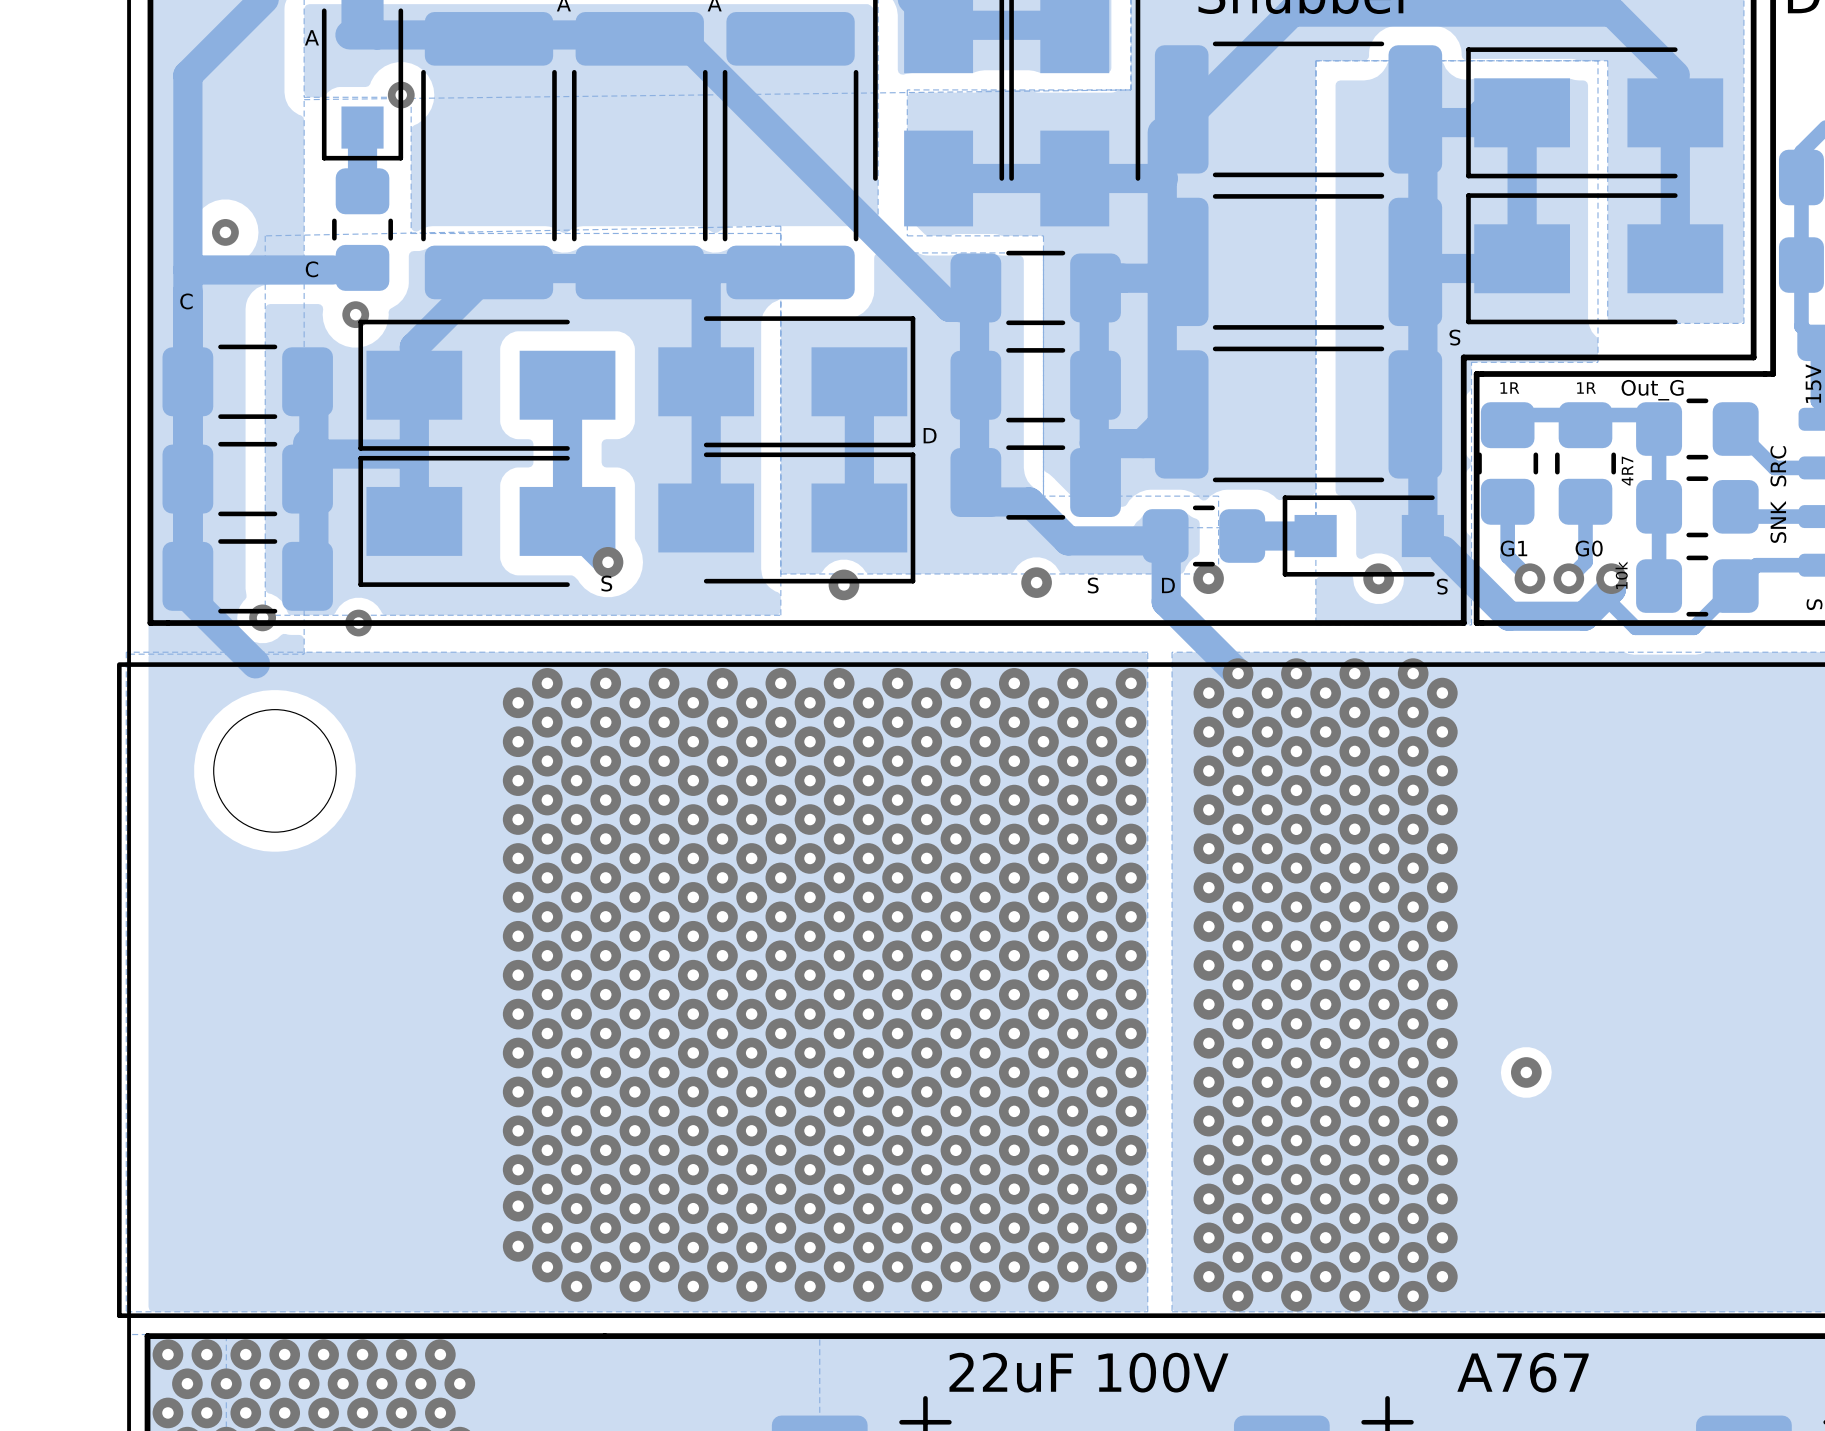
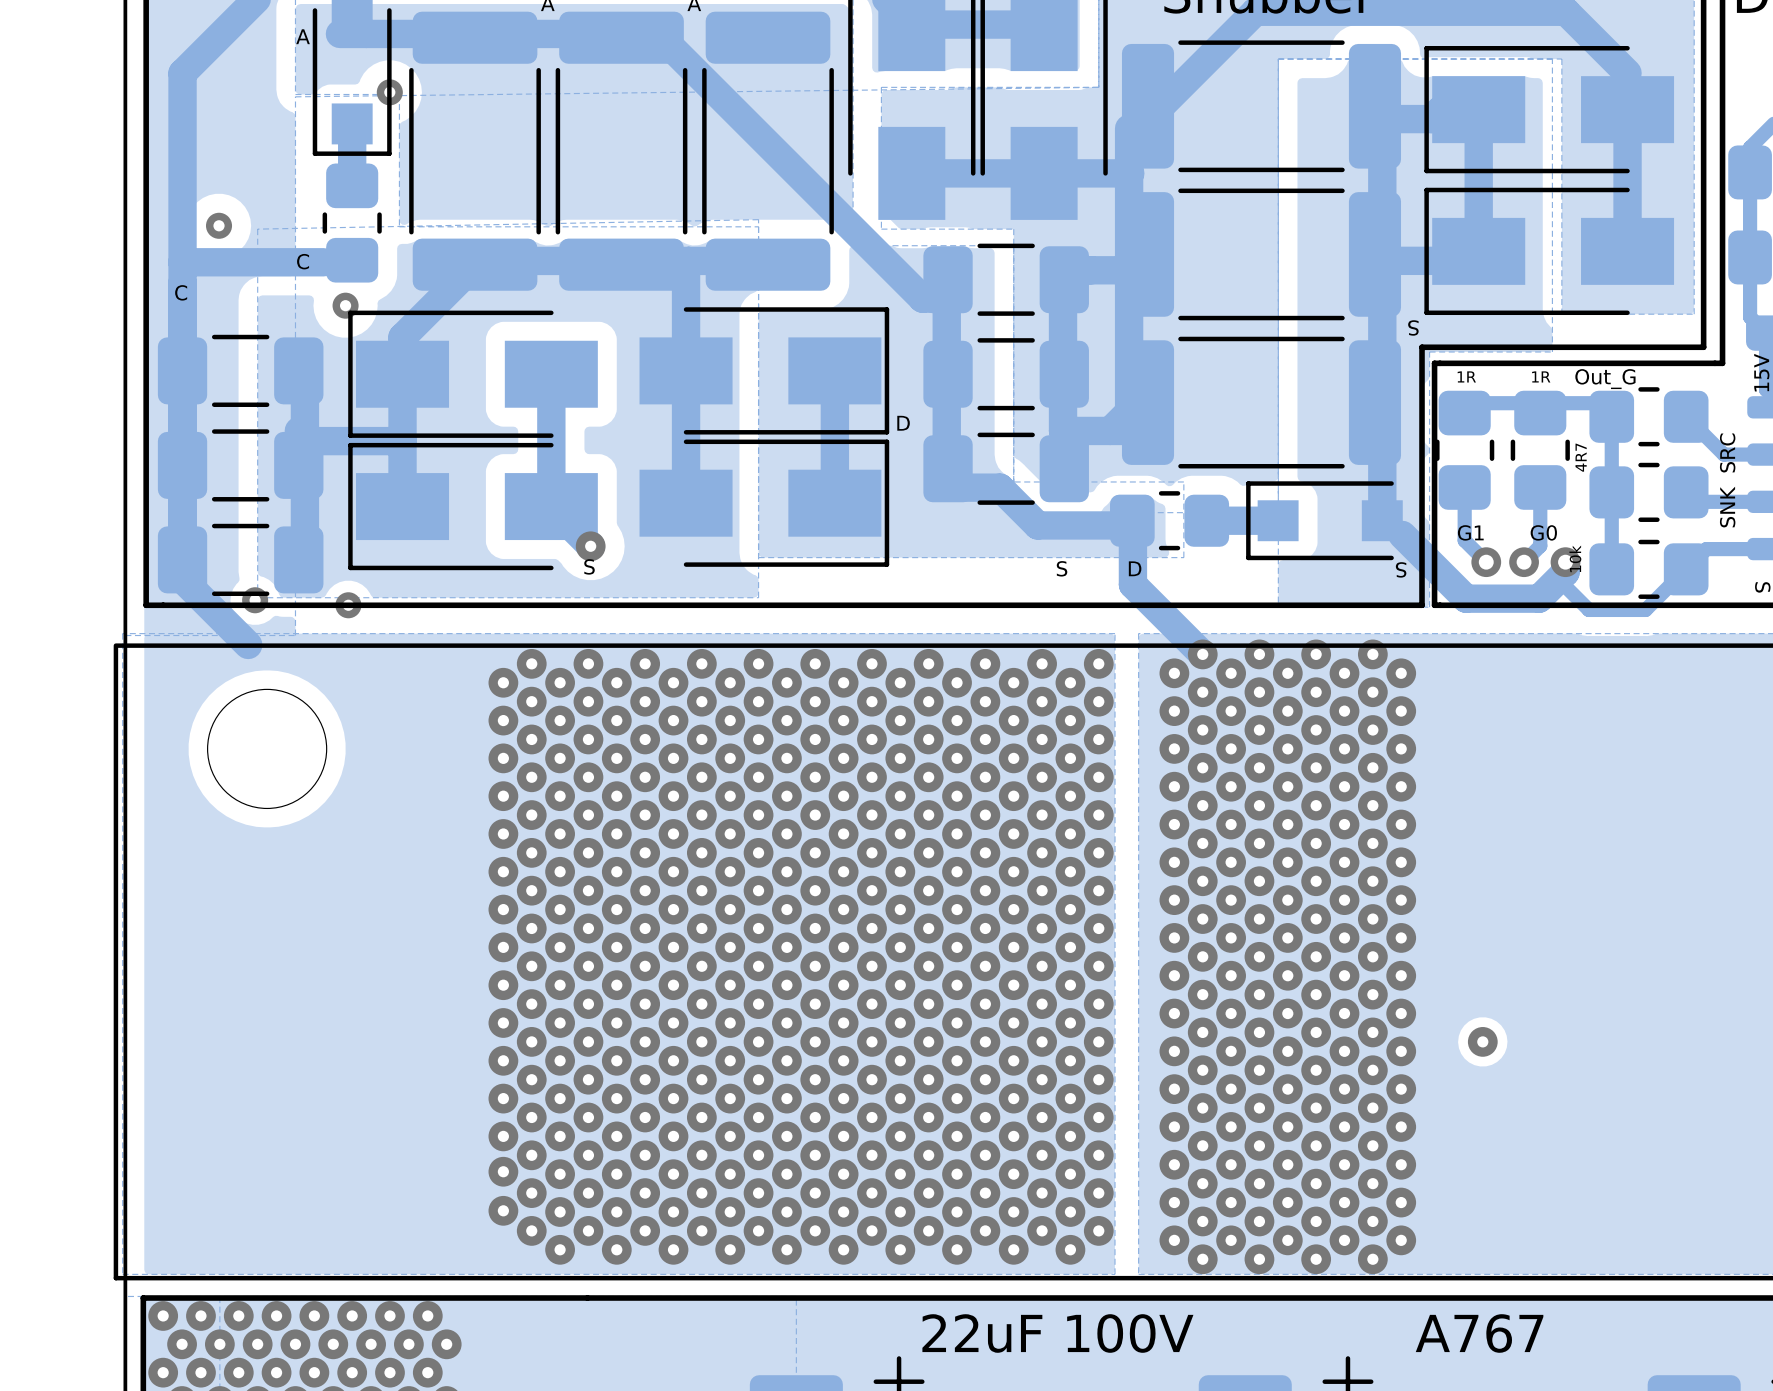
via: (1208, 578) -> none
via: (1378, 578) -> none
via: (1036, 582) -> none
via: (843, 584) -> none

